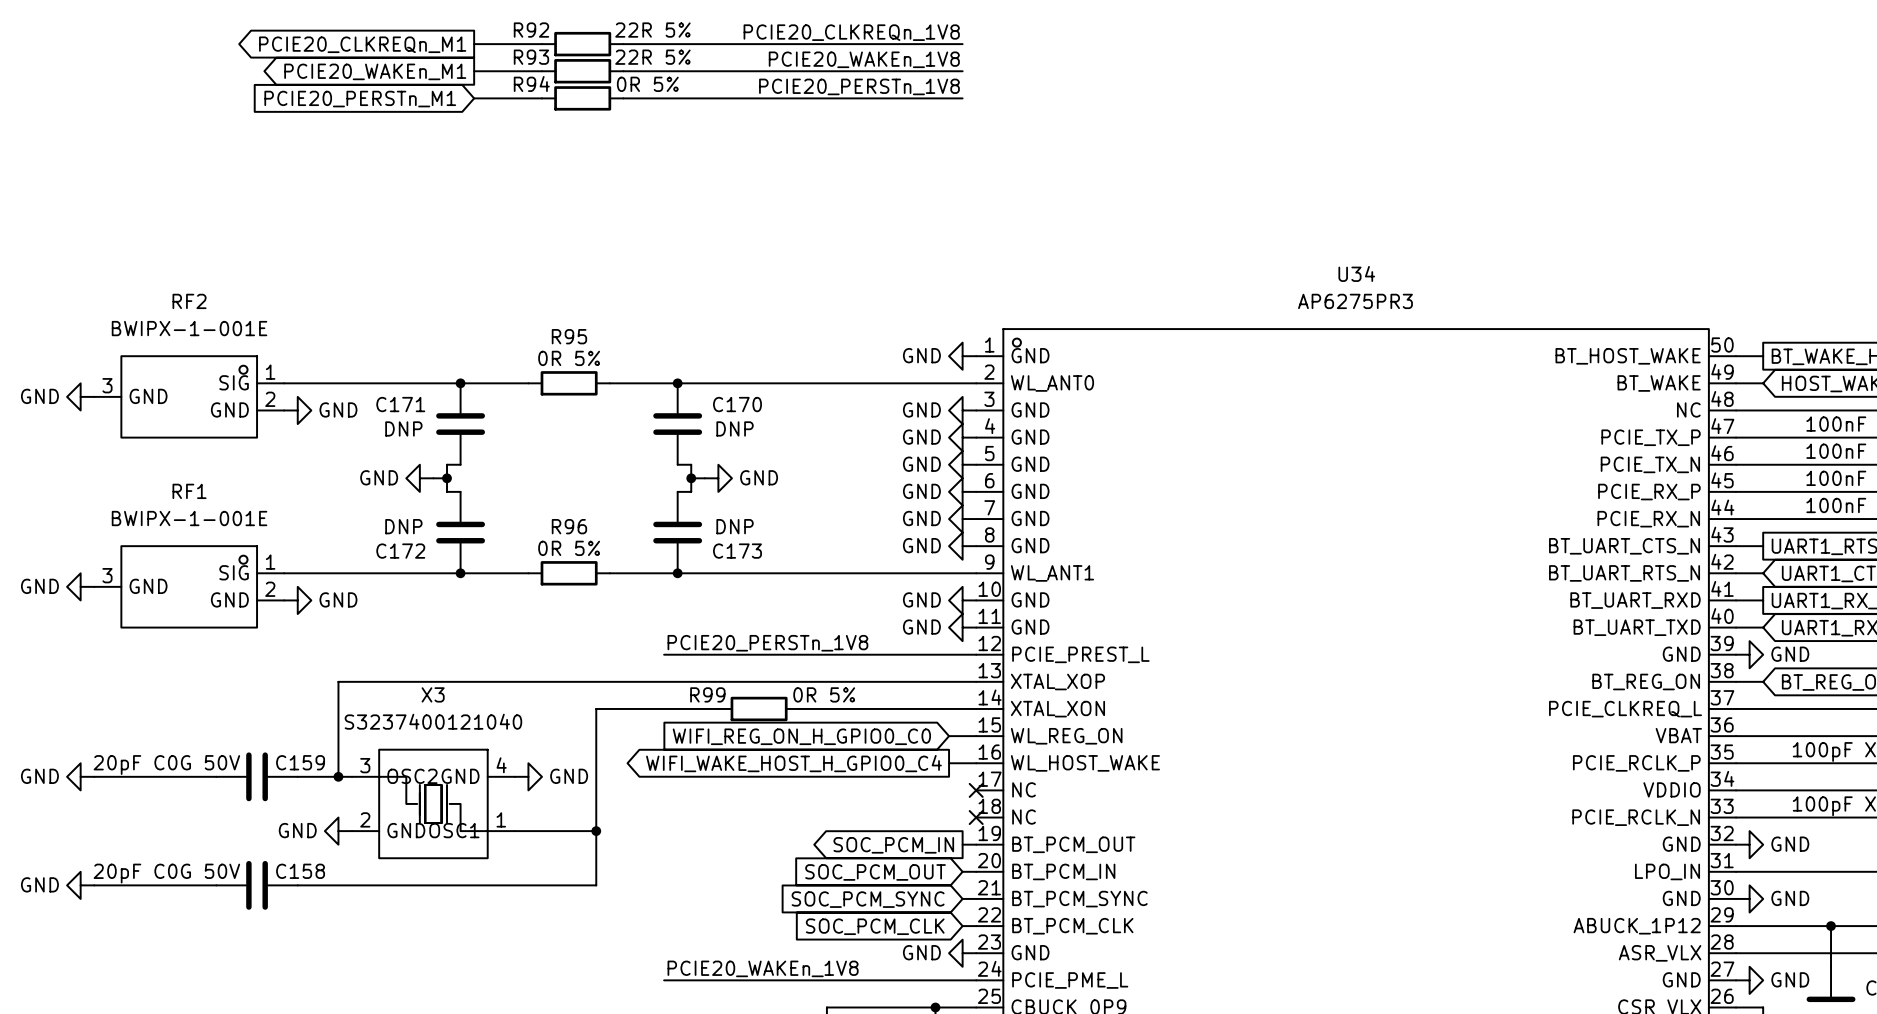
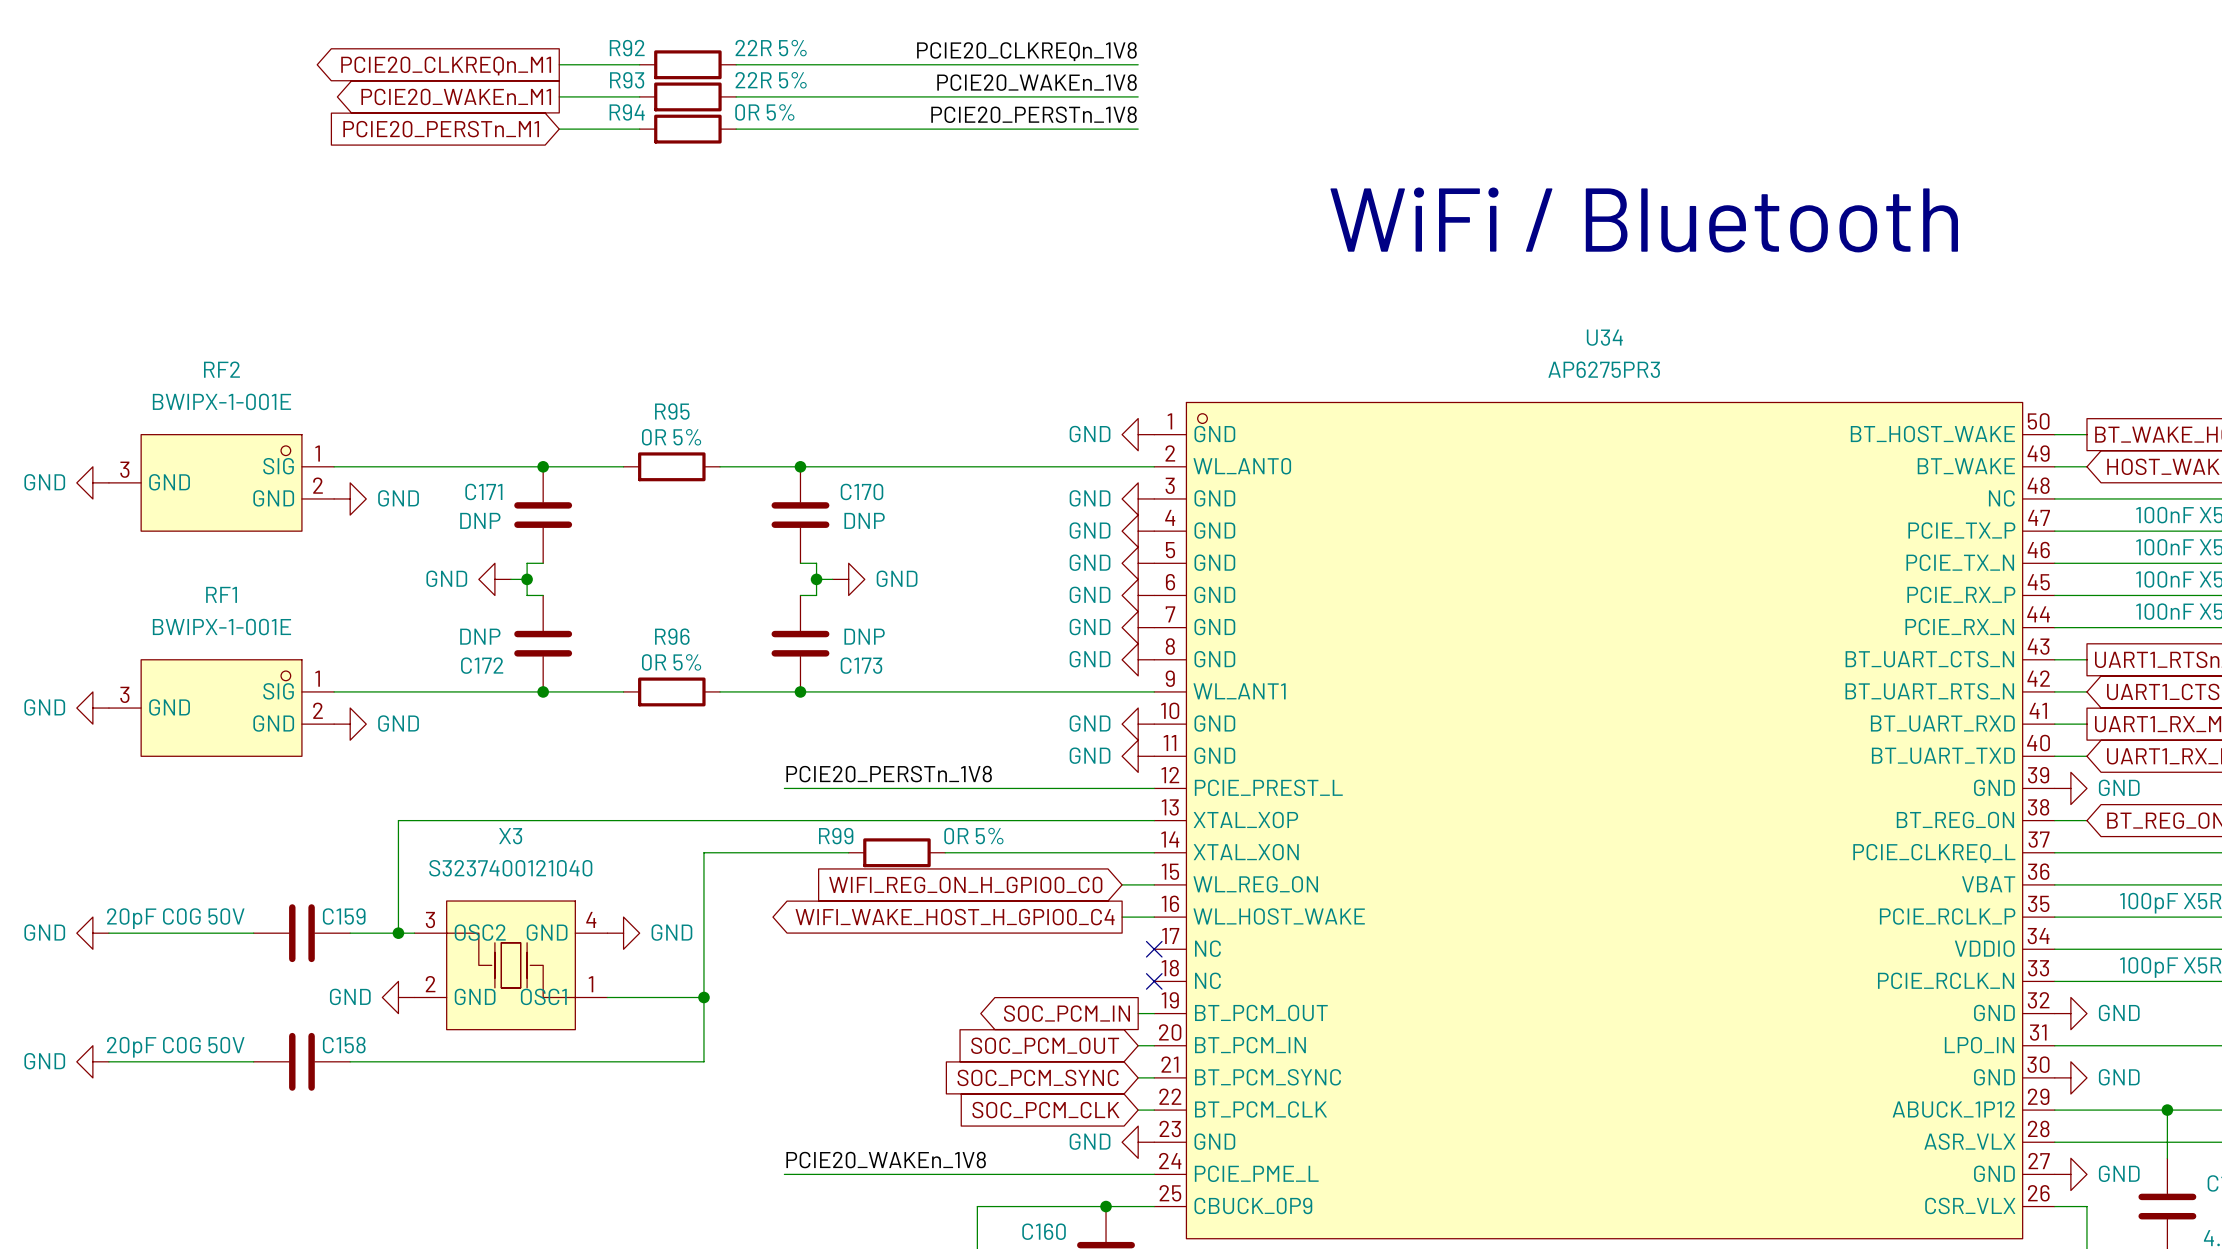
text: none -> WiFi / Bluetooth (1644, 220)

